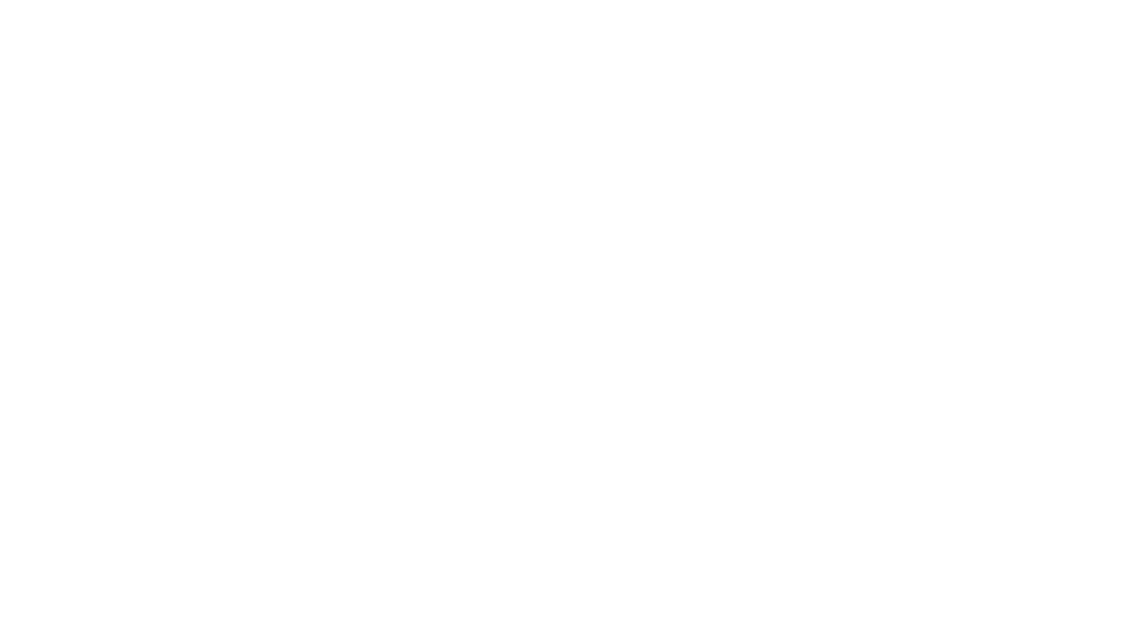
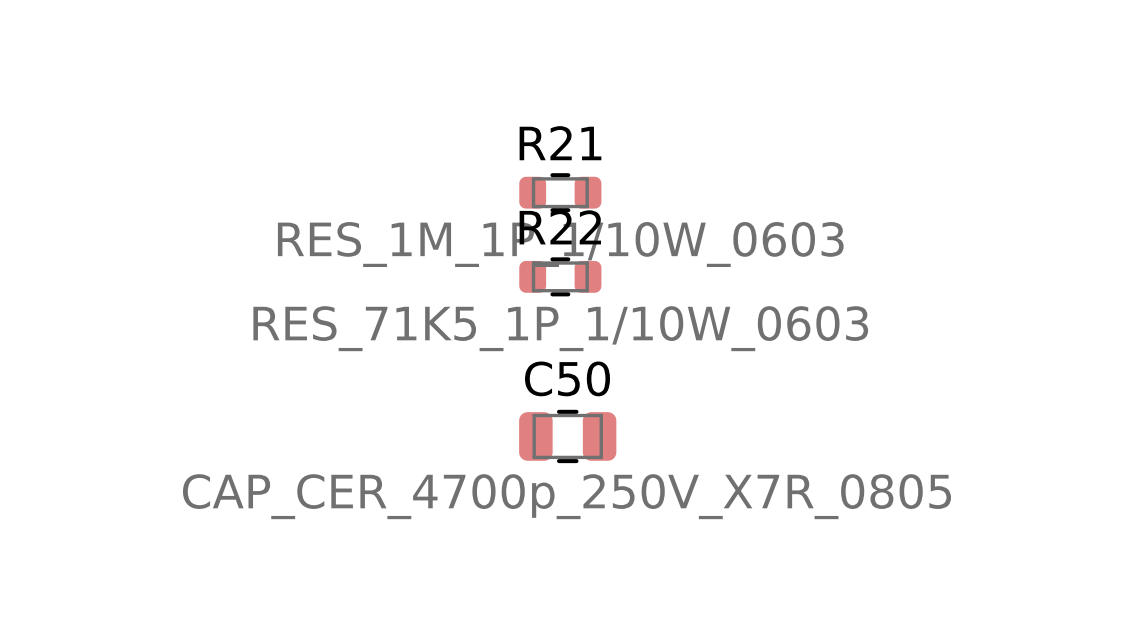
R21: none -> RES_1M_1P_1/10W_0603 (560, 192)
R22: none -> RES_71K5_1P_1/10W_0603 (560, 276)
C50: none -> CAP_CER_4700p_250V_X7R_0805 (567, 436)

